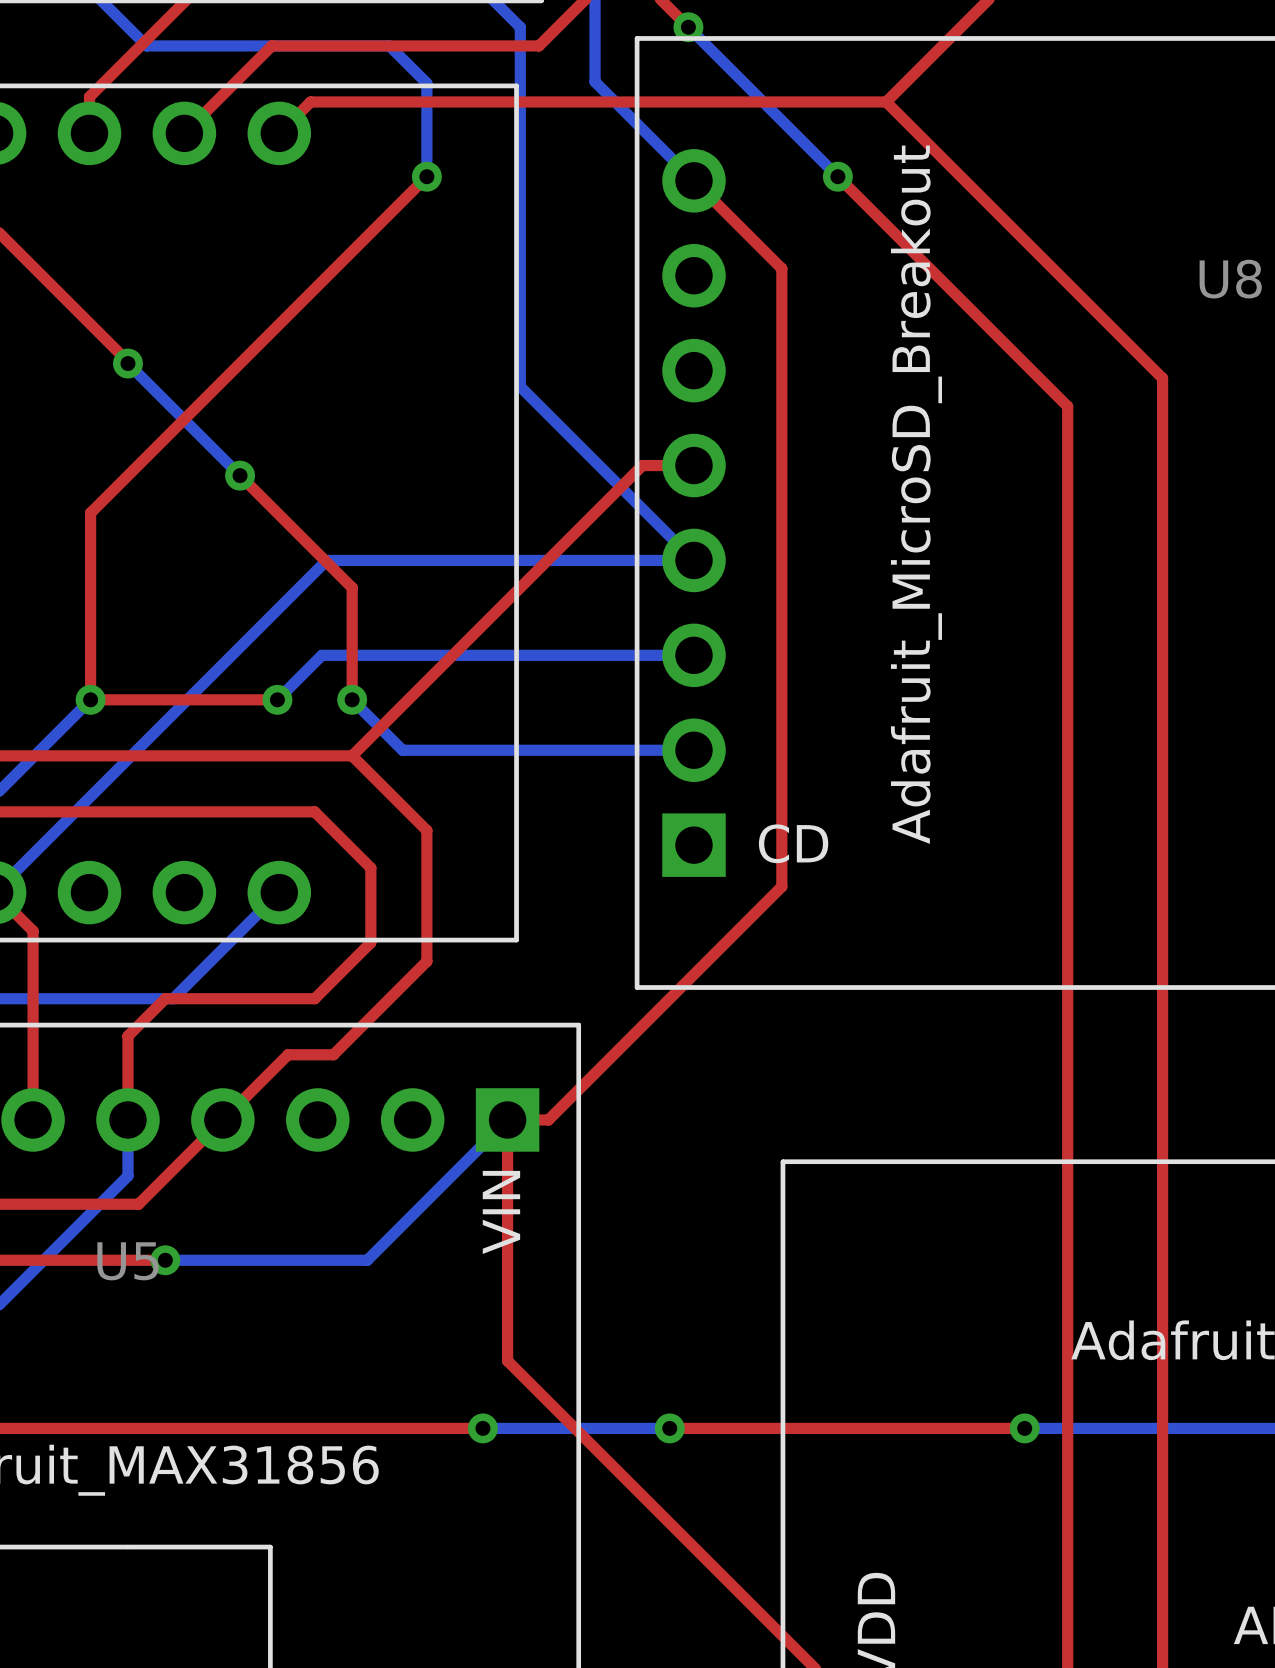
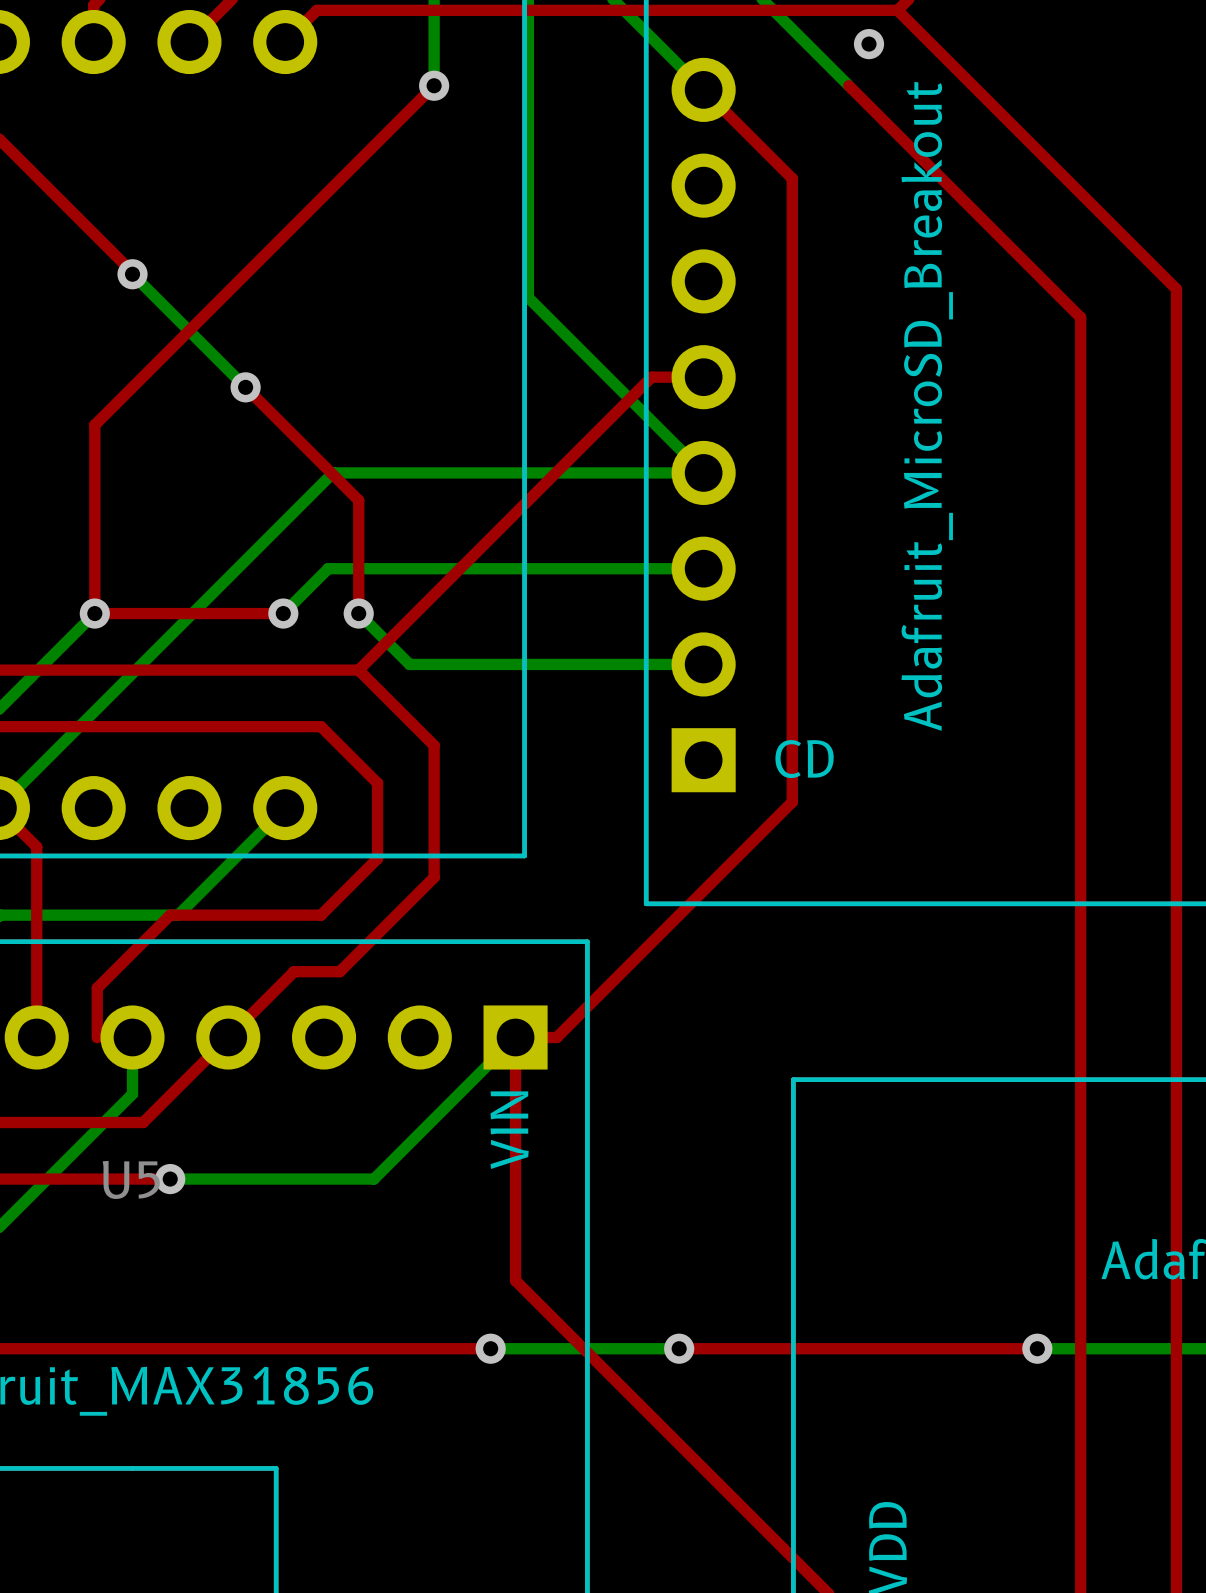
via position: (837, 176) -> (869, 44)
top track: (127, 1036) (127, 1119) -> (132, 952) (97, 988) (97, 1037)

